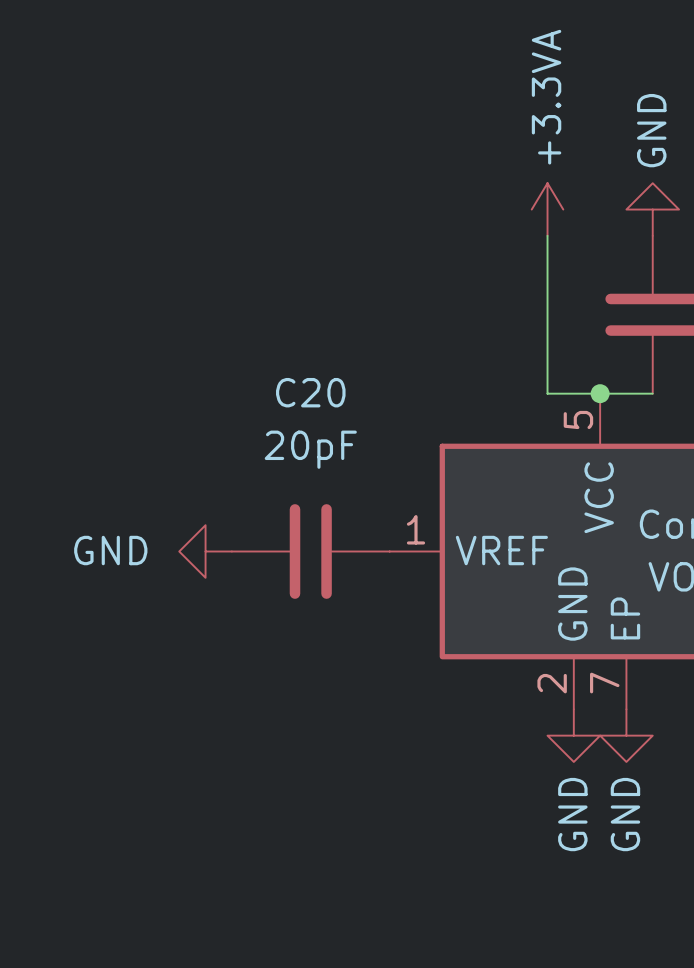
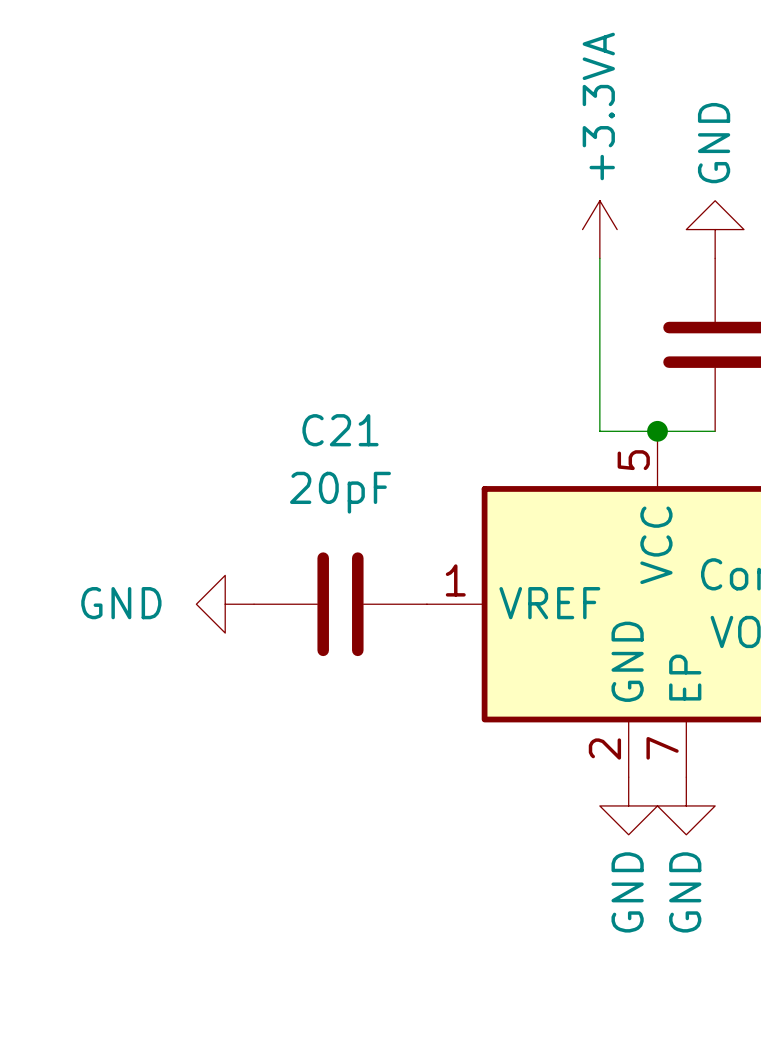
C20 name: C20 (310, 392) -> C21 (340, 430)

